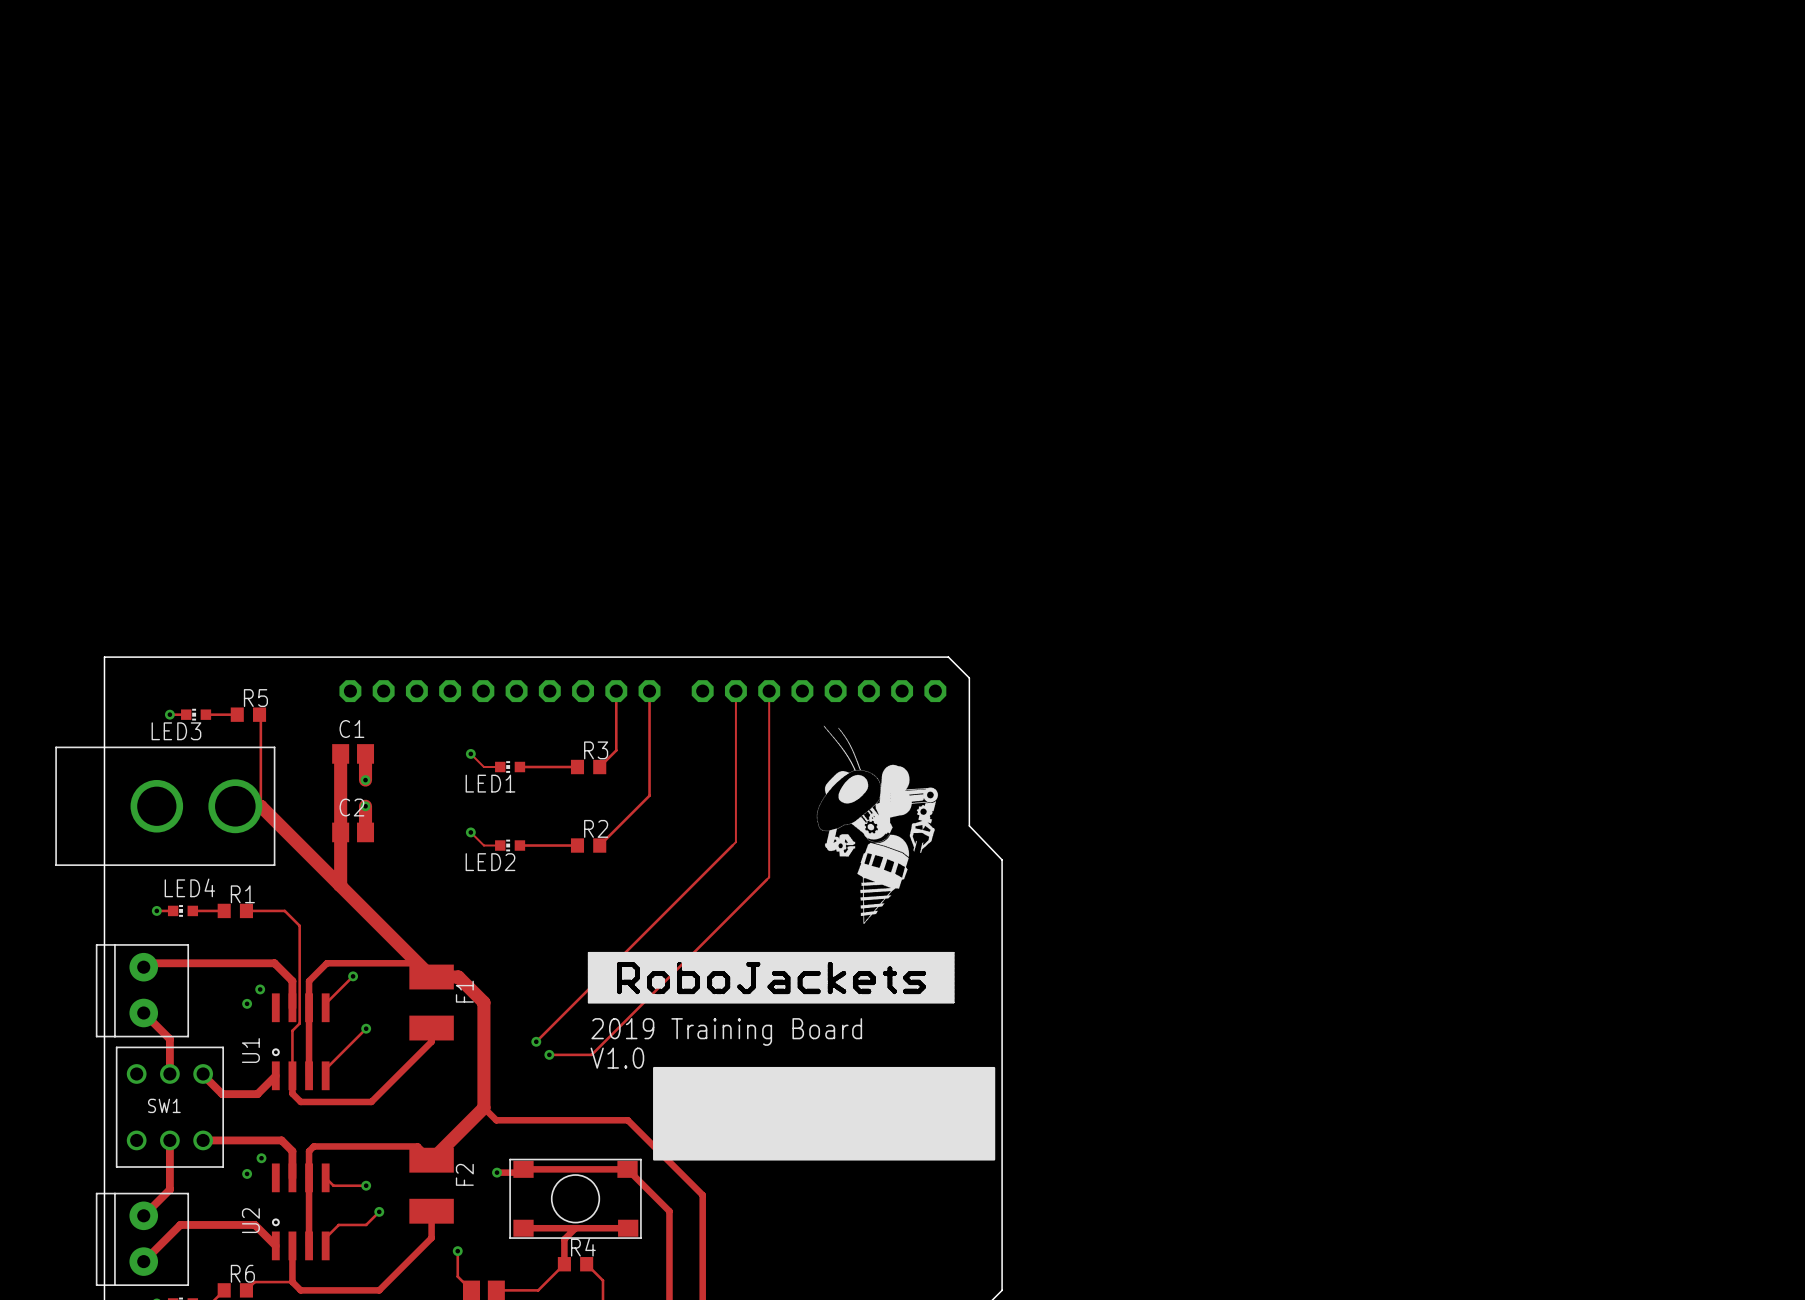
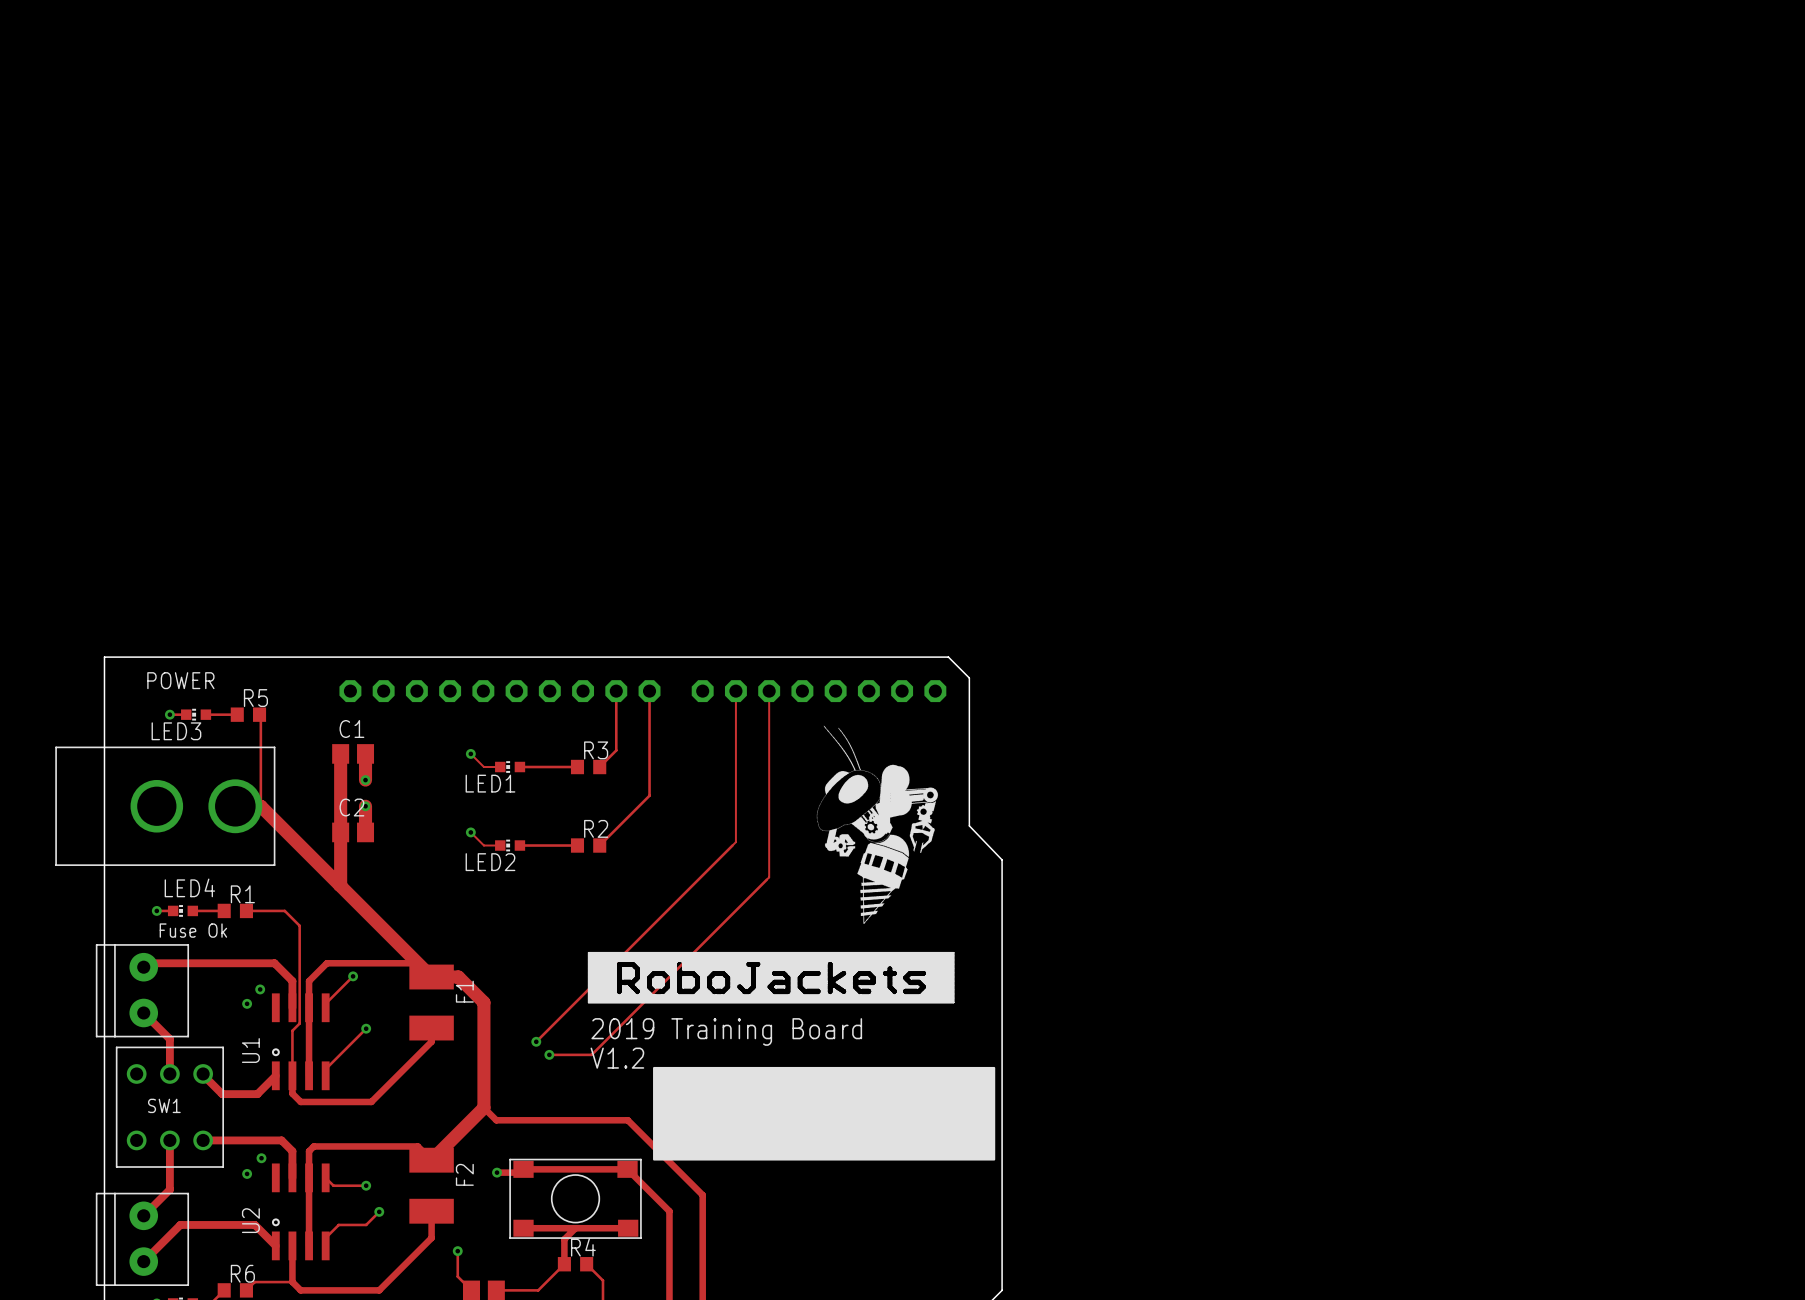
text: none -> POWER (180, 680)
text: none -> Fuse Ok (193, 930)
text: V1.0 (617, 1058) -> V1.2 (617, 1058)

